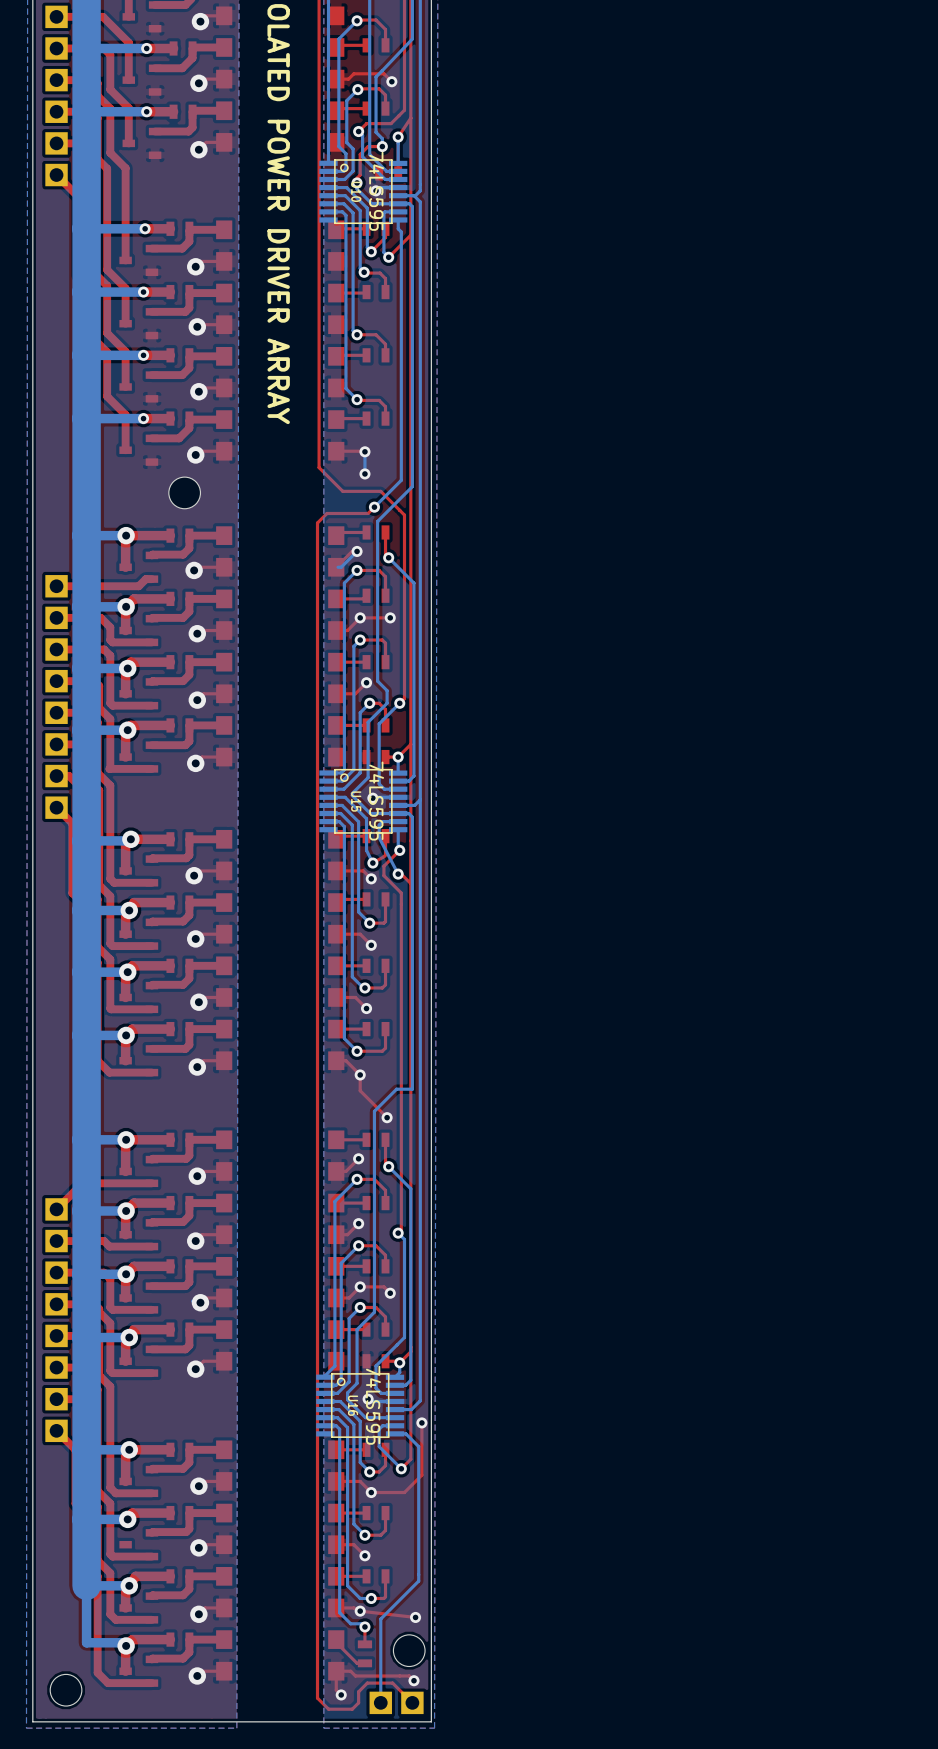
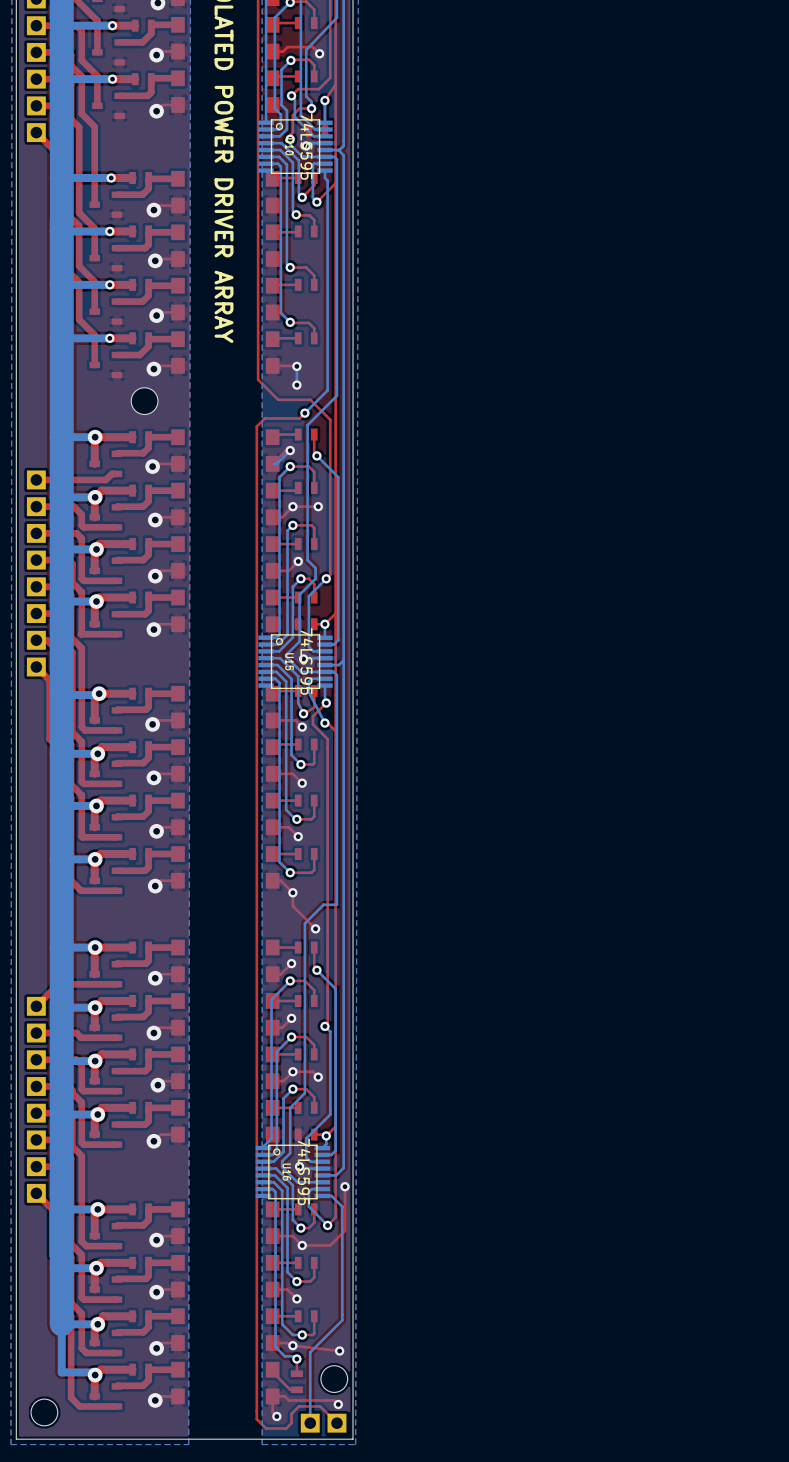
top track: none -> (96, 1268) (94, 1269) (94, 1289)

